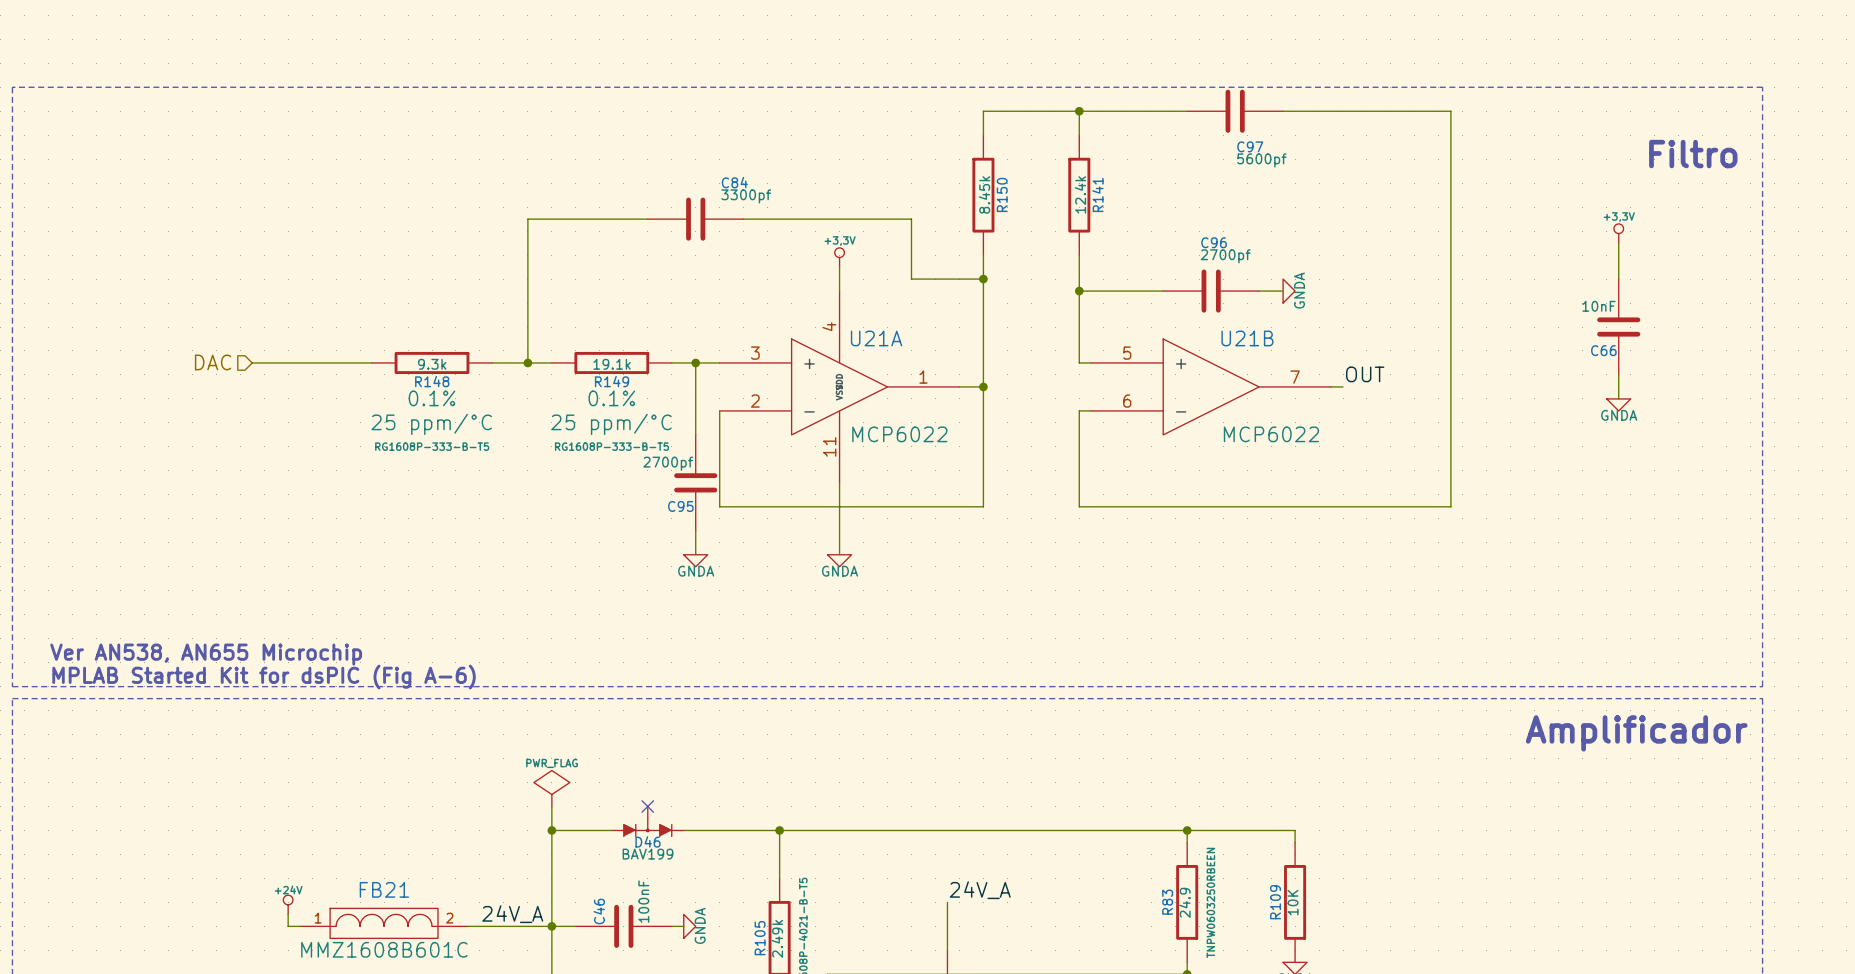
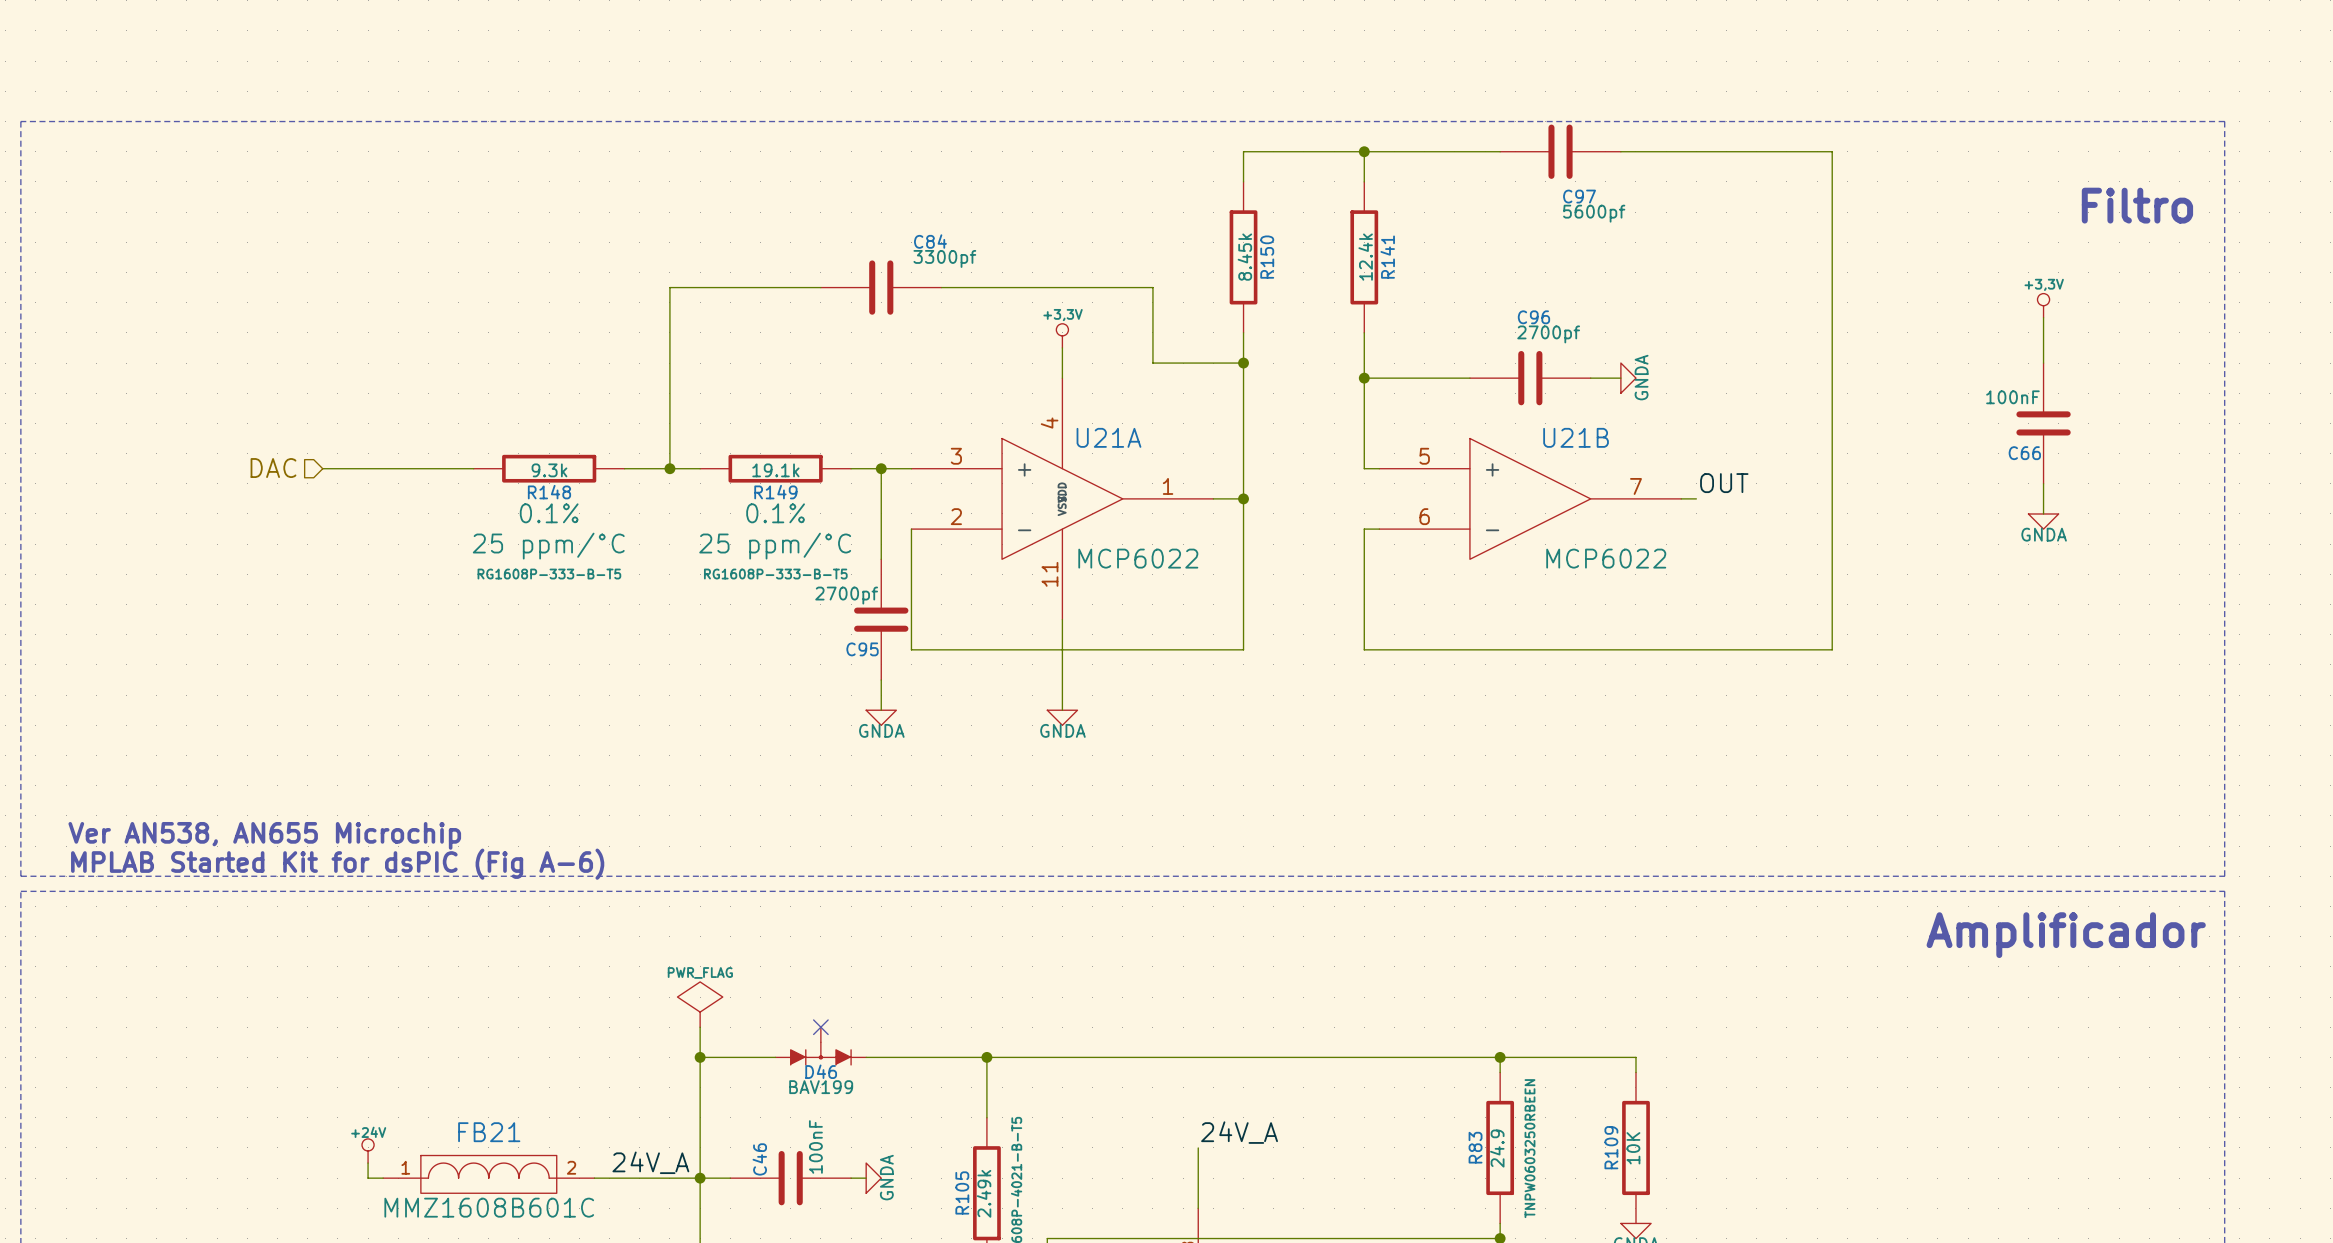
C66 value: 10nF (1598, 306) -> 100nF (2012, 397)

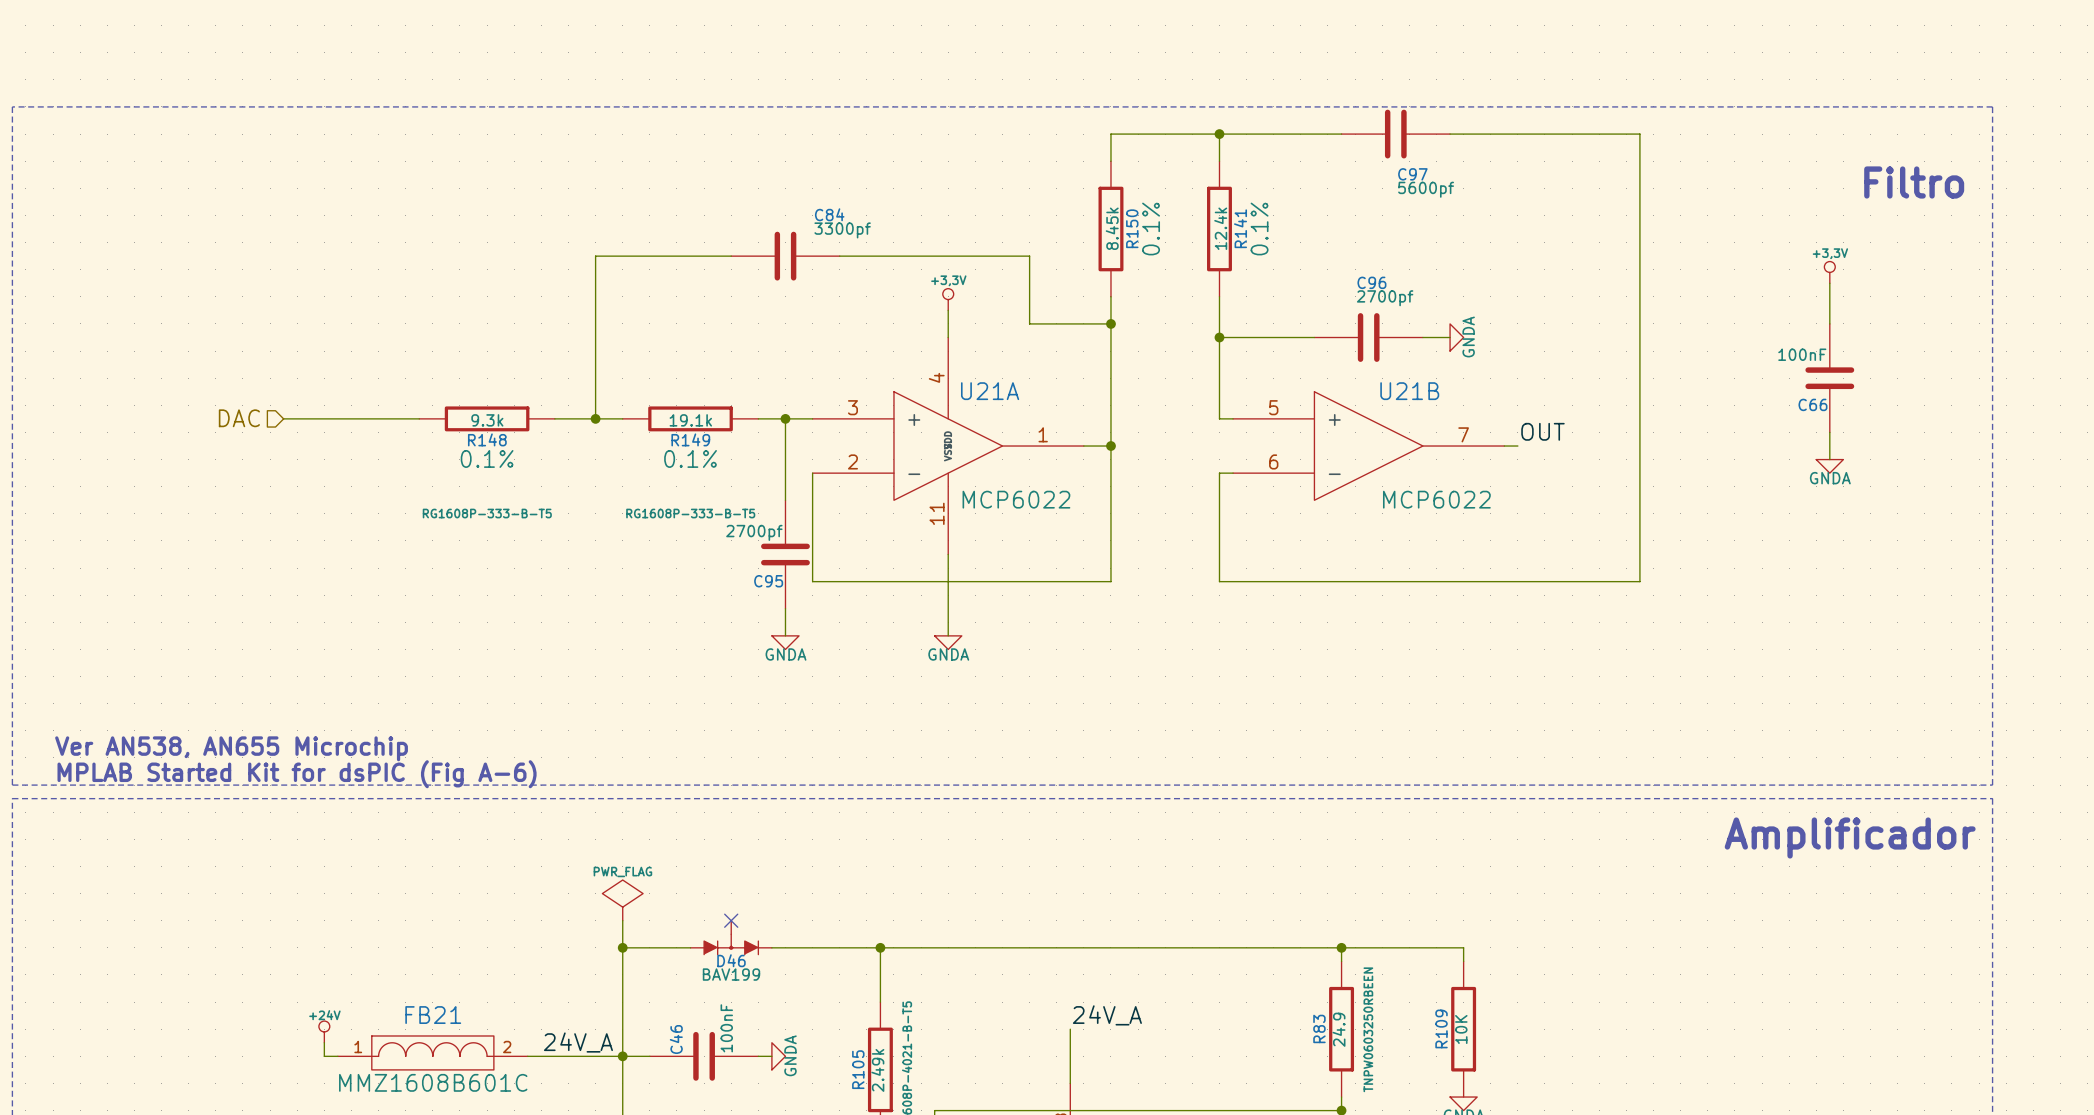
R150 text: none -> 0.1% (1151, 229)
R141 text: none -> 0.1% (1259, 229)
R148 text: 25 ppm/°C (548, 546) -> none
R149 text: 25 ppm/°C (775, 546) -> none

